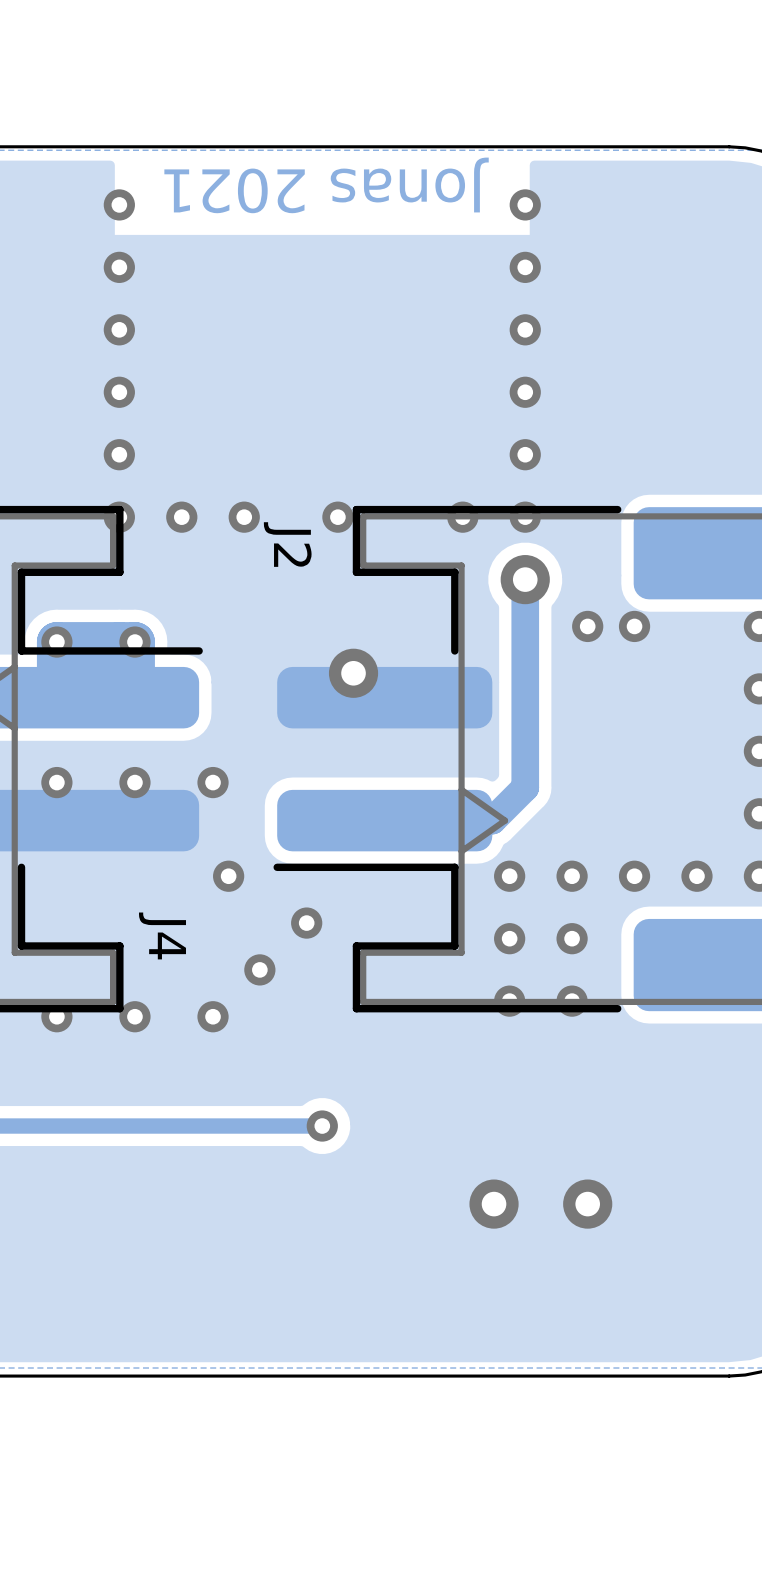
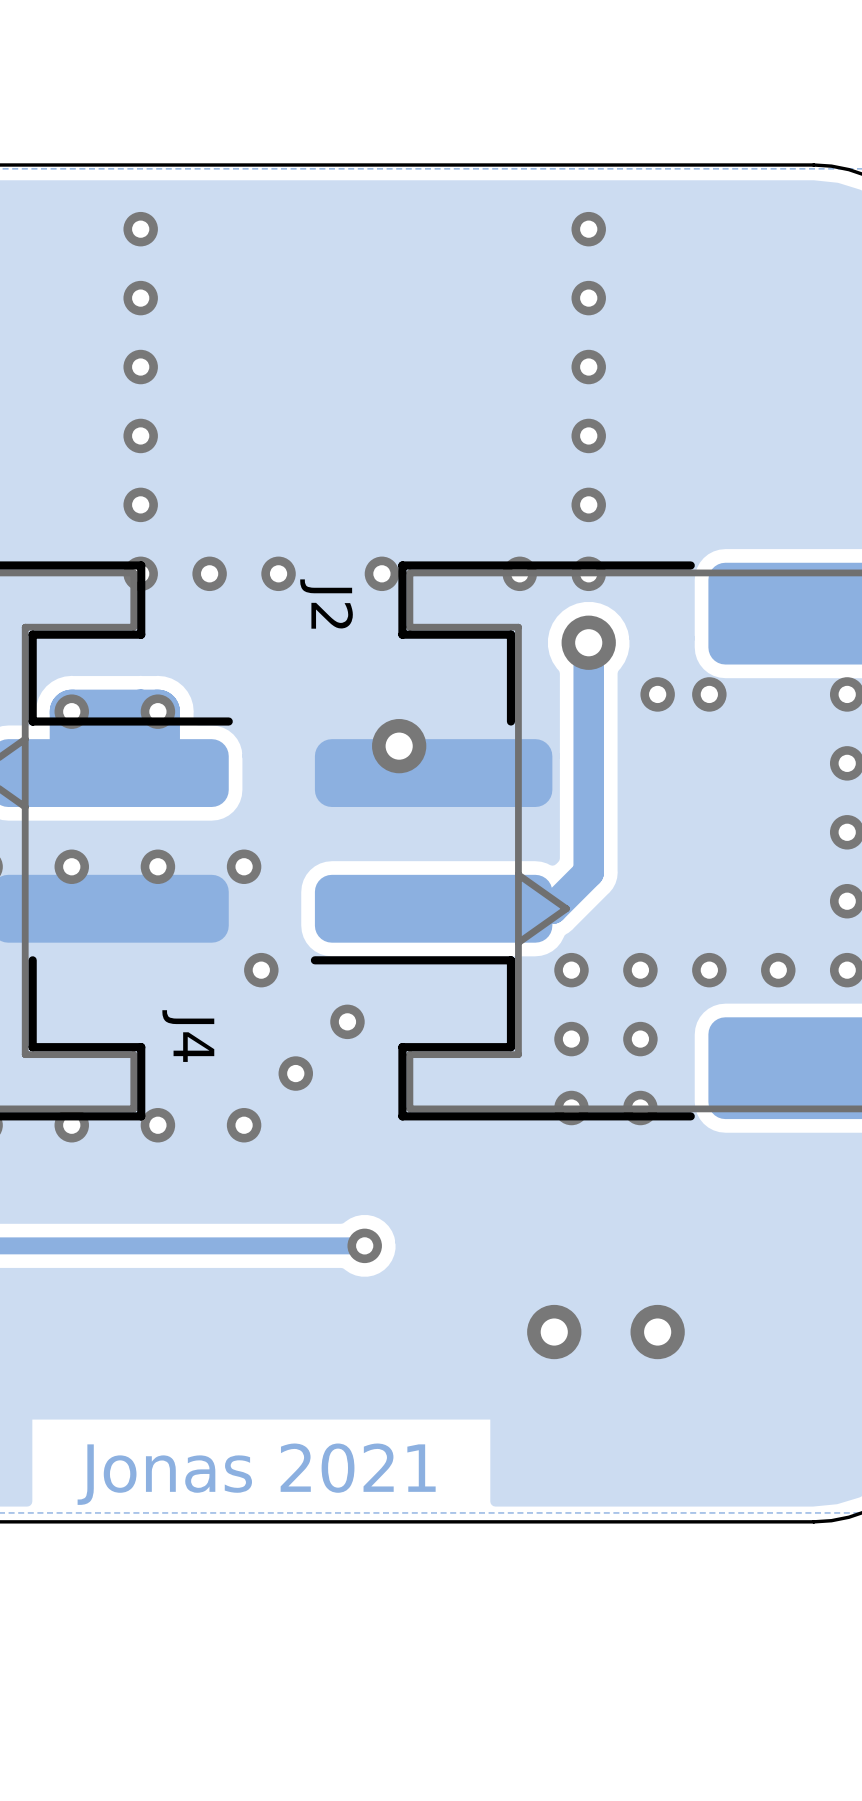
text rotation: 0° (326, 185) -> 180° (256, 1474)
text position: Jonas 2021 (326, 185) -> Jonas 2021 (256, 1474)

